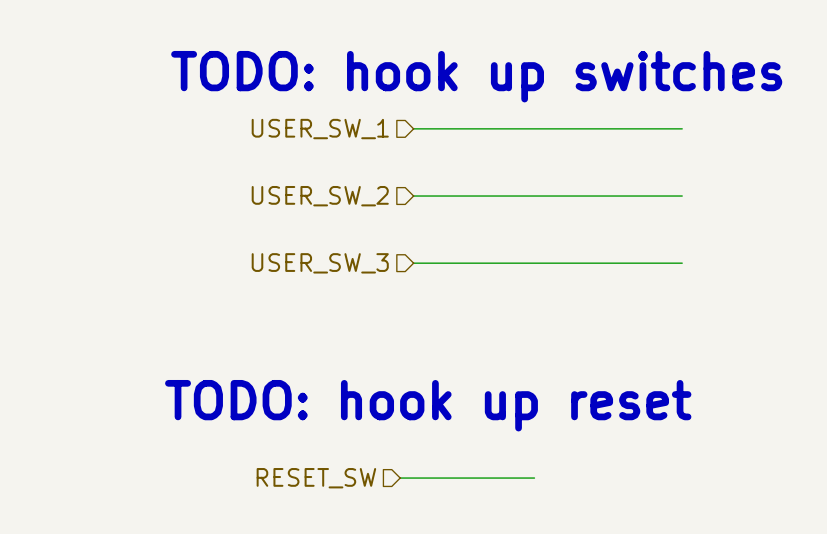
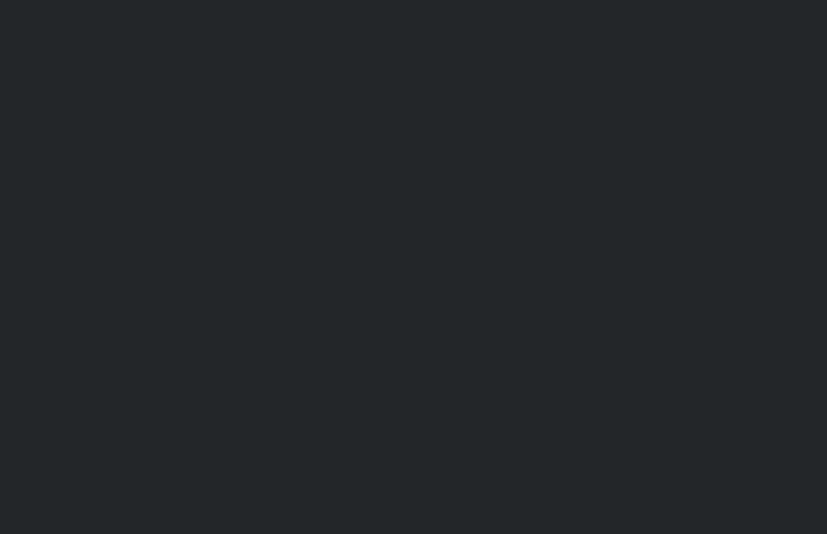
text: TODO: hook up switches (476, 76) -> none
wire: (413, 128) (682, 128) -> none
hierarchical label: USER_SW_1 (320, 129) -> none
hierarchical label: USER_SW_2 (320, 196) -> none
wire: (413, 196) (682, 196) -> none
hierarchical label: USER_SW_3 (320, 263) -> none
wire: (413, 263) (682, 263) -> none
text: TODO: hook up reset (428, 405) -> none
hierarchical label: RESET_SW (316, 478) -> none
wire: (400, 478) (534, 478) -> none

